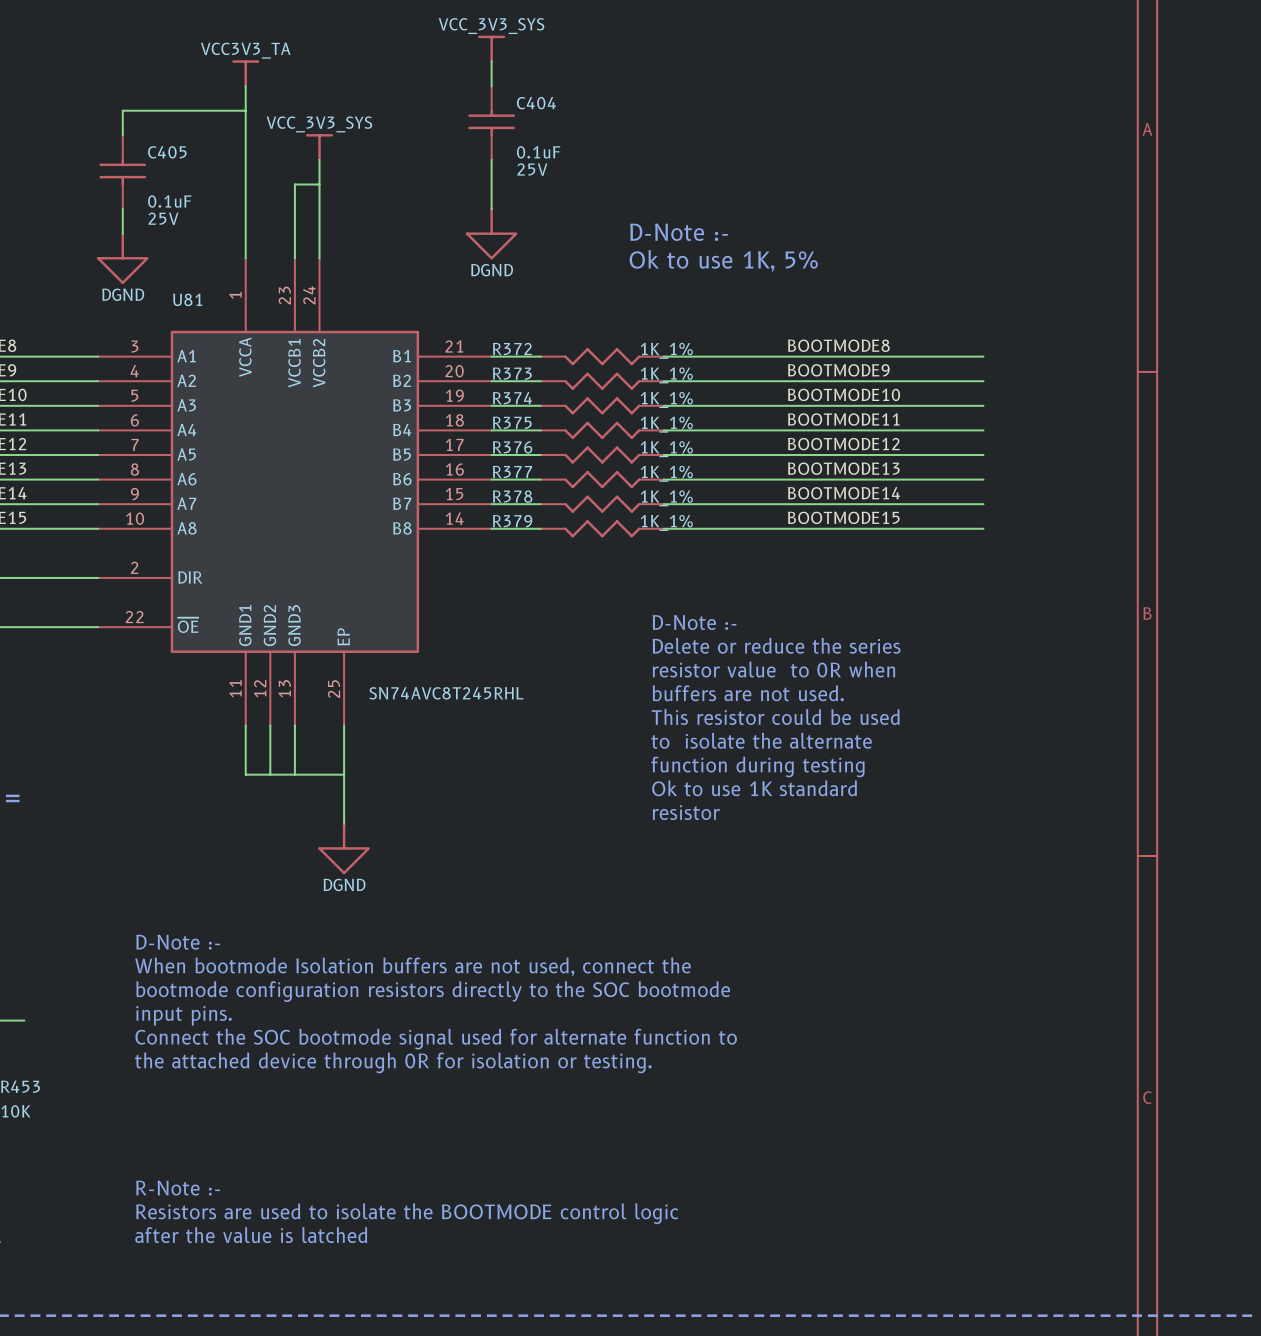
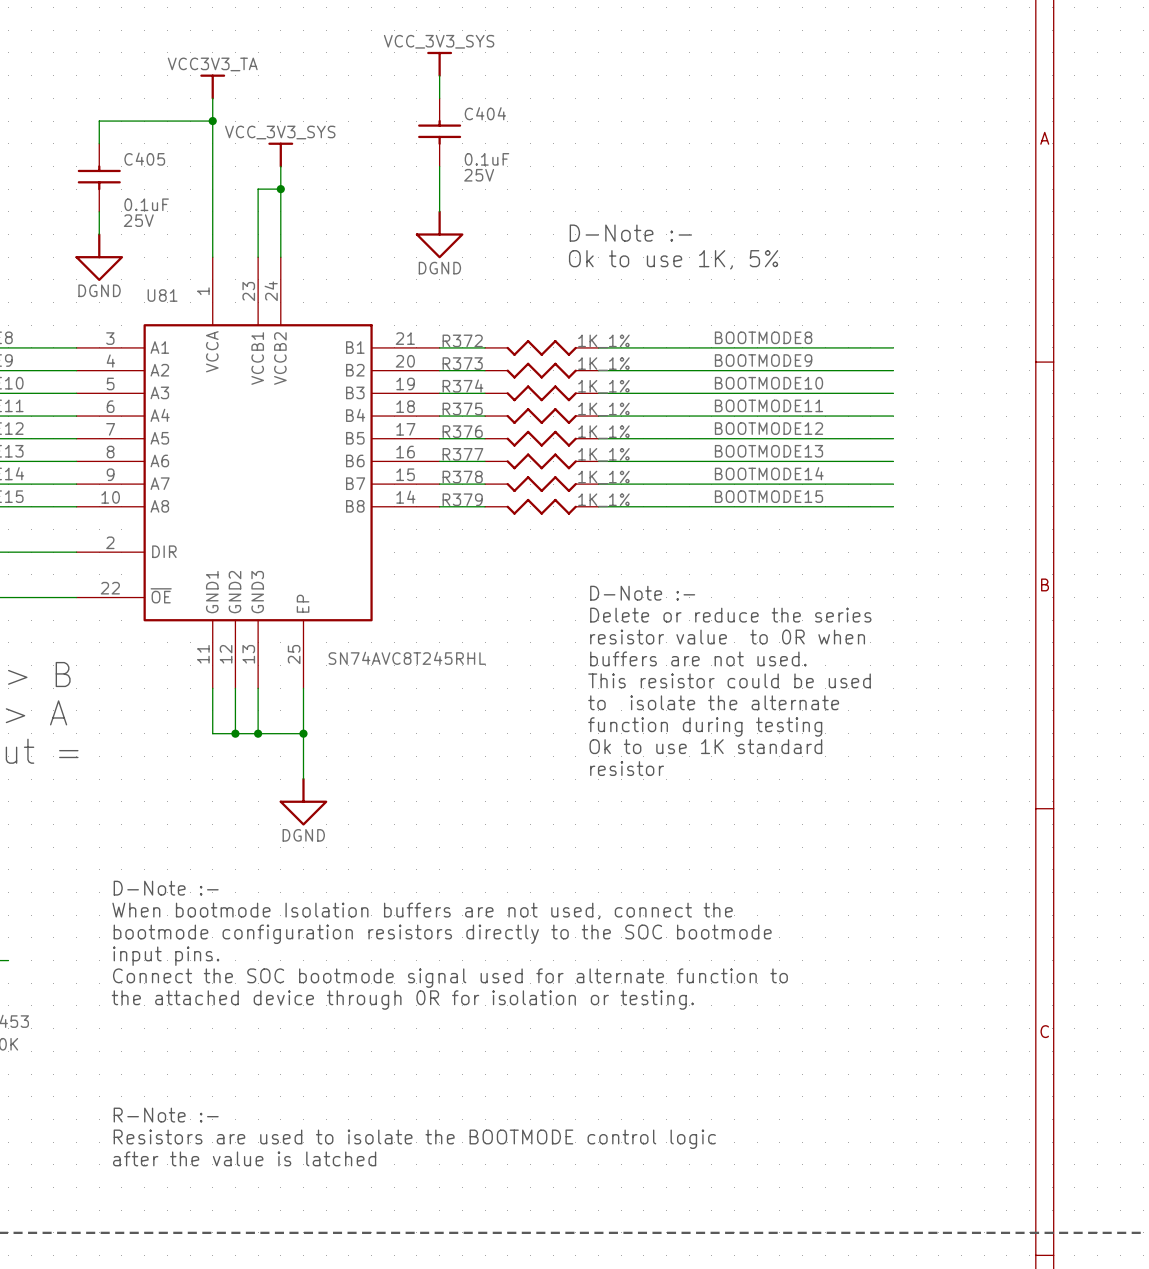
junction: none -> (212, 121)
junction: none -> (280, 189)
junction: none -> (235, 733)
junction: none -> (258, 733)
junction: none -> (303, 733)

